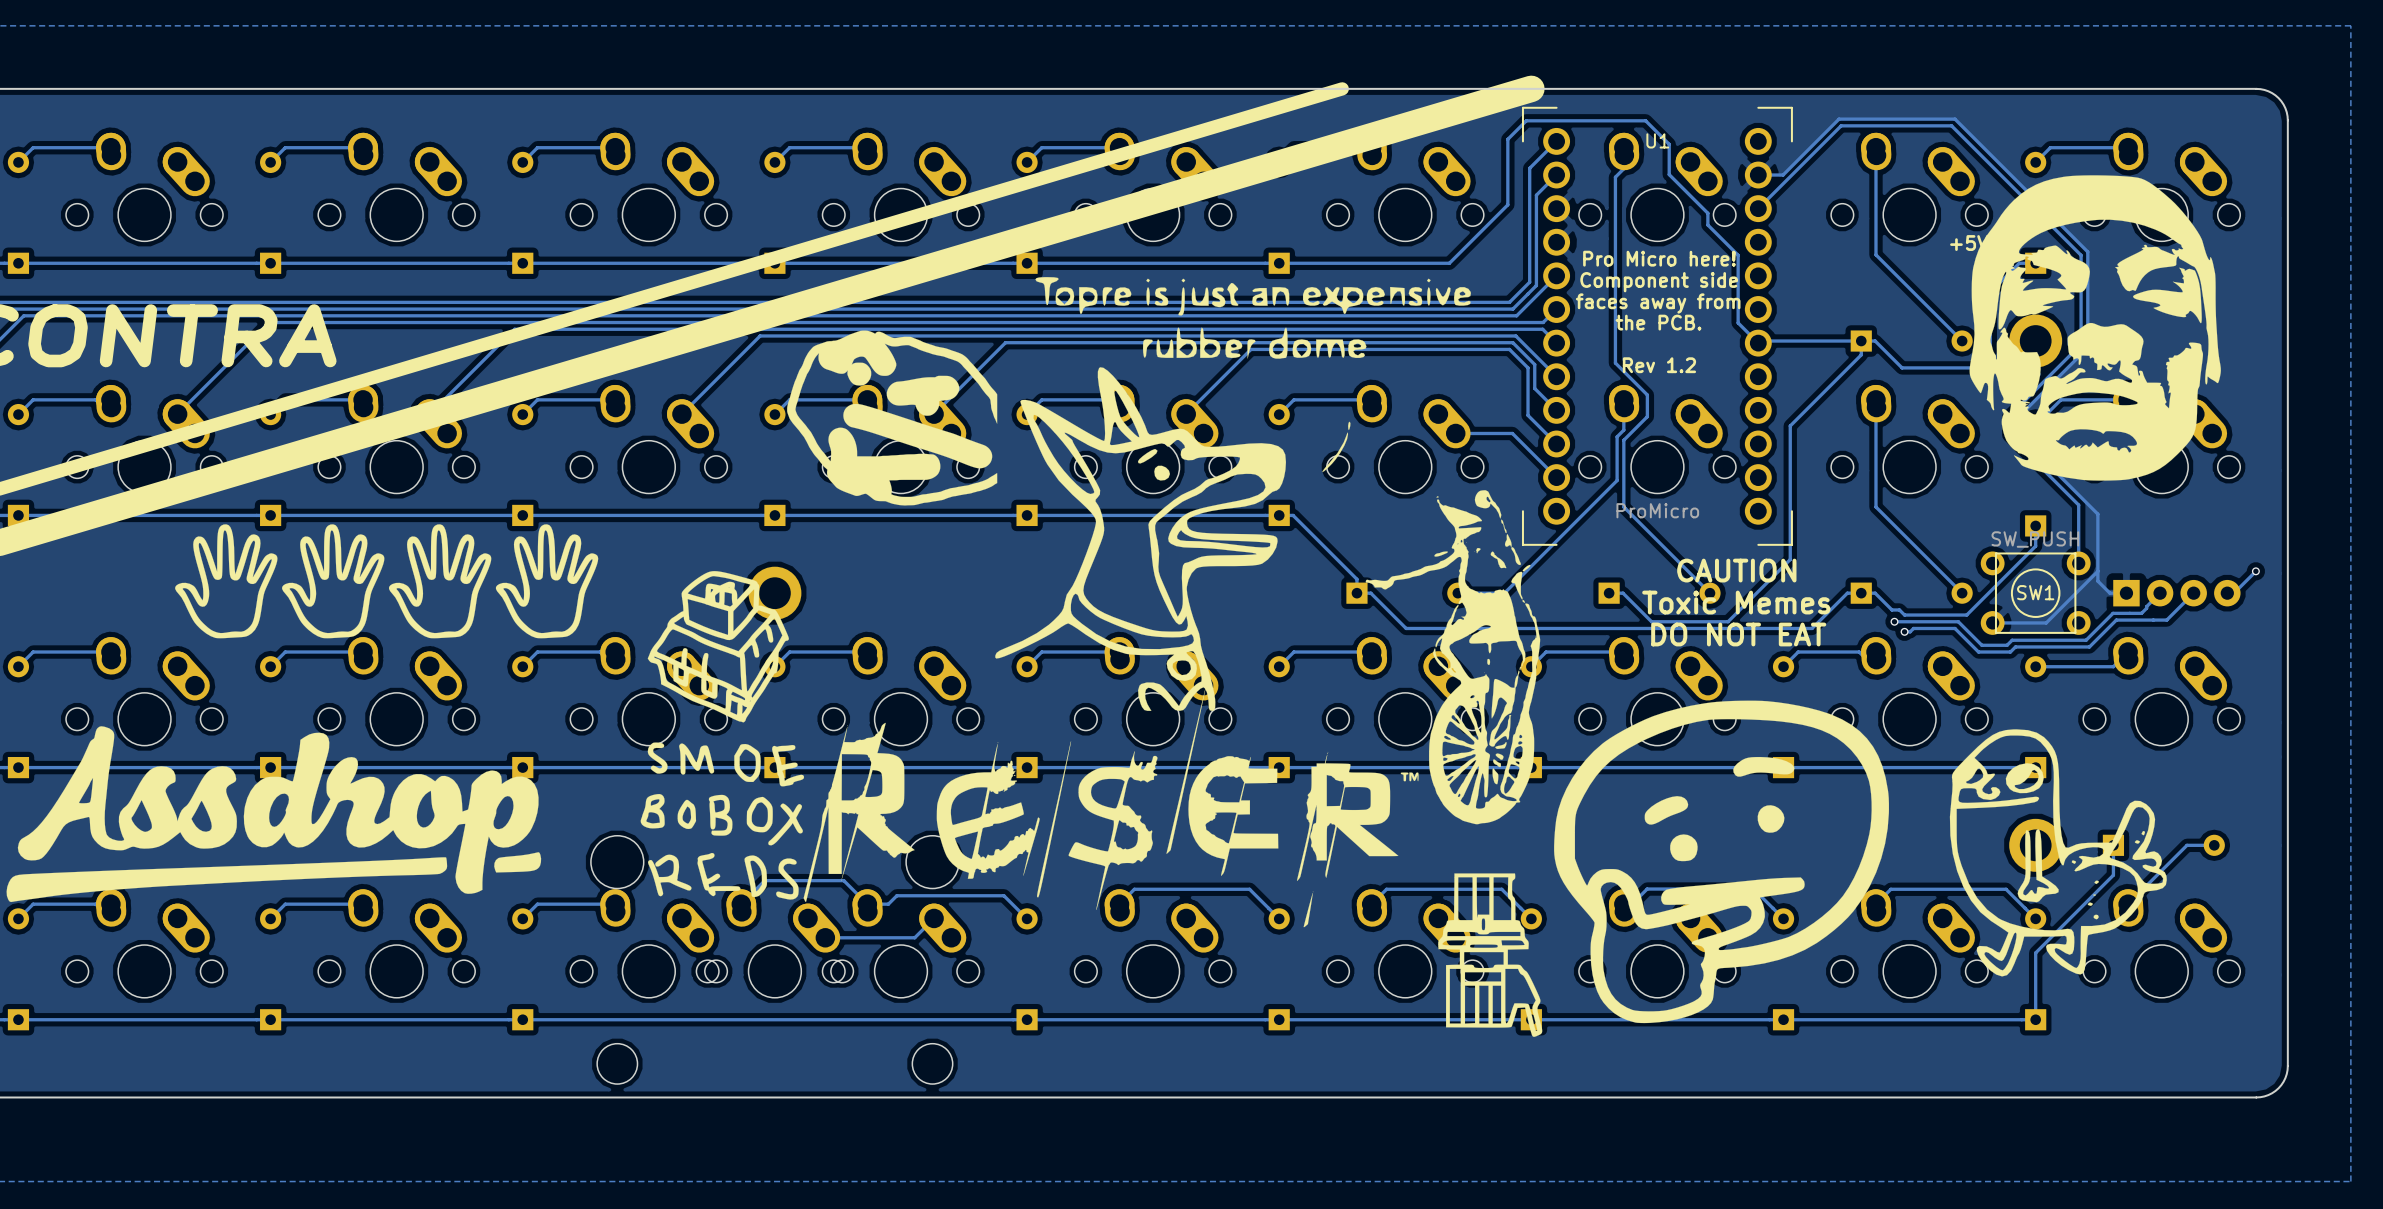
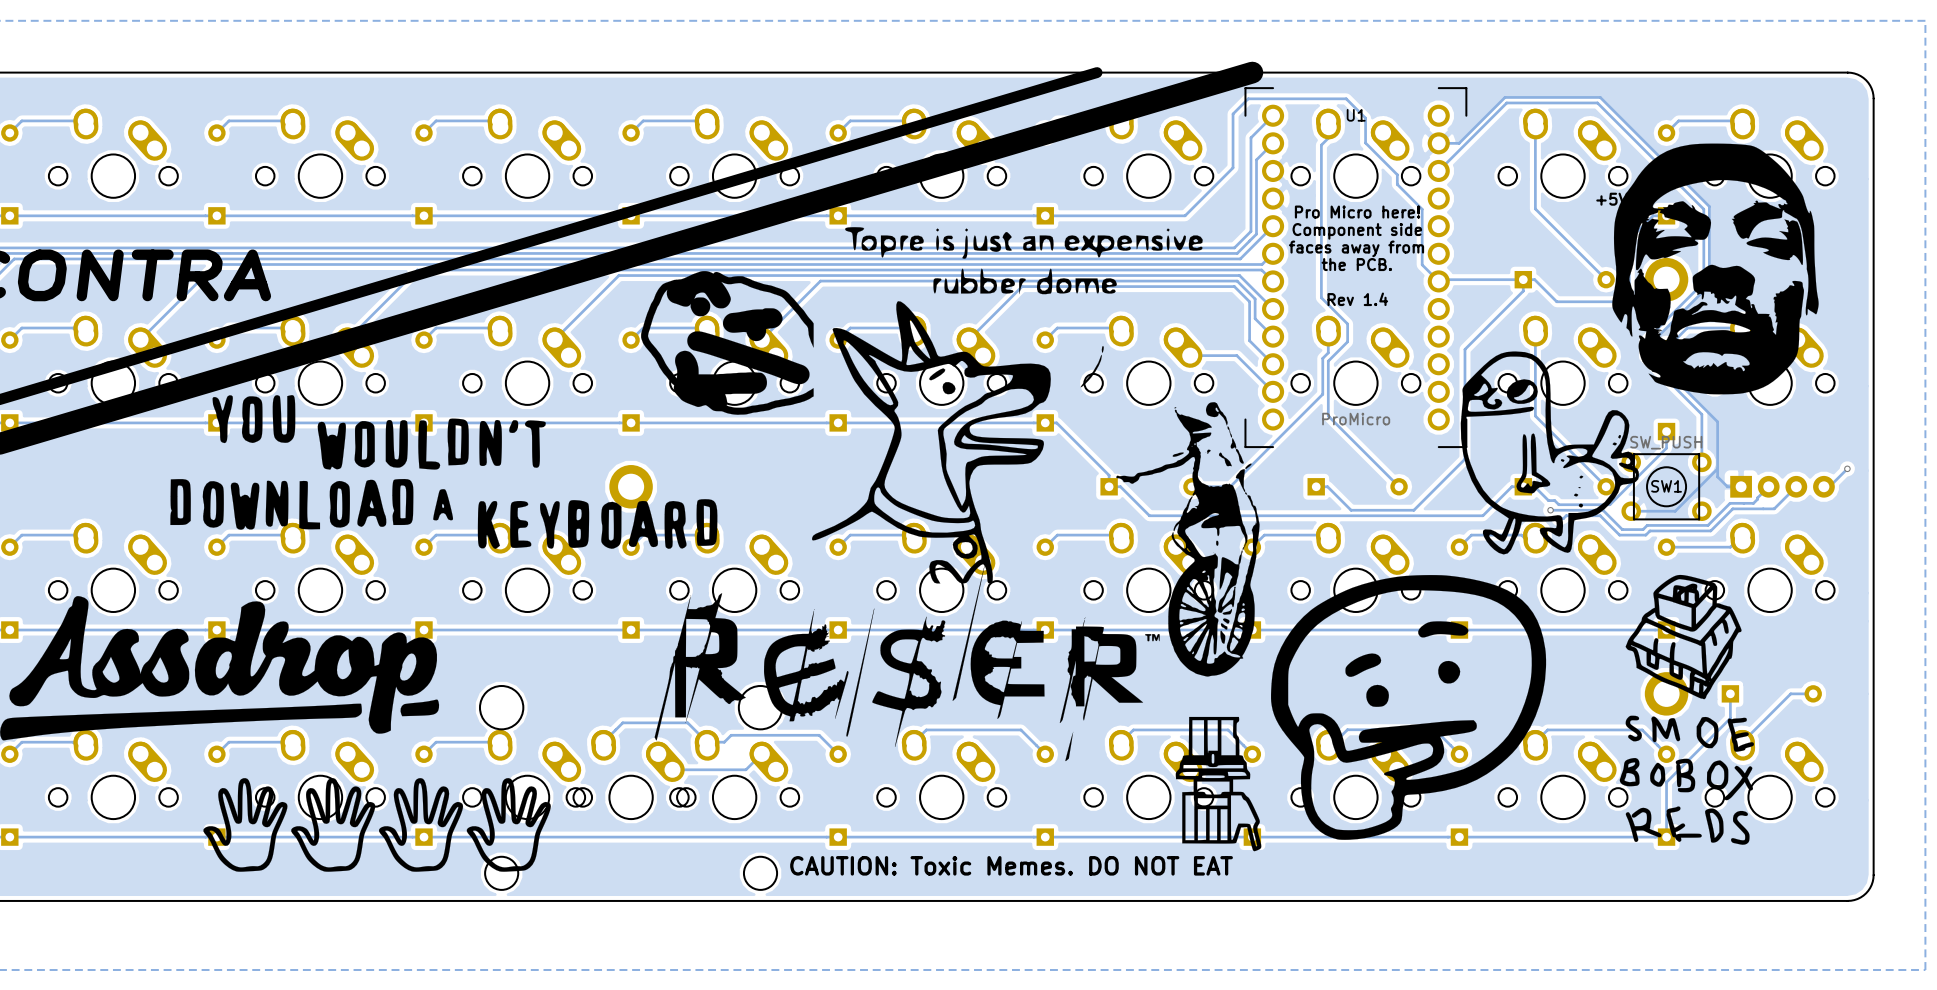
text: Rev 1.2 (1659, 365) -> Rev 1.4 (1357, 299)
drawing: none -> [1460, 351, 1639, 555]
drawing: none -> [170, 395, 718, 549]
drawing: [175, 524, 599, 639] -> none
text: CAUTION (1736, 570) -> none
drawing: [640, 571, 805, 900] -> none
text: Toxic Memes (1736, 602) -> none
text: DO NOT EAT (1738, 634) -> none
drawing shape: [1949, 729, 2167, 977] -> [1619, 574, 1754, 845]
drawing: none -> [203, 778, 551, 872]
text: none -> CAUTION: Toxic Memes. DO NOT EAT (1011, 865)

